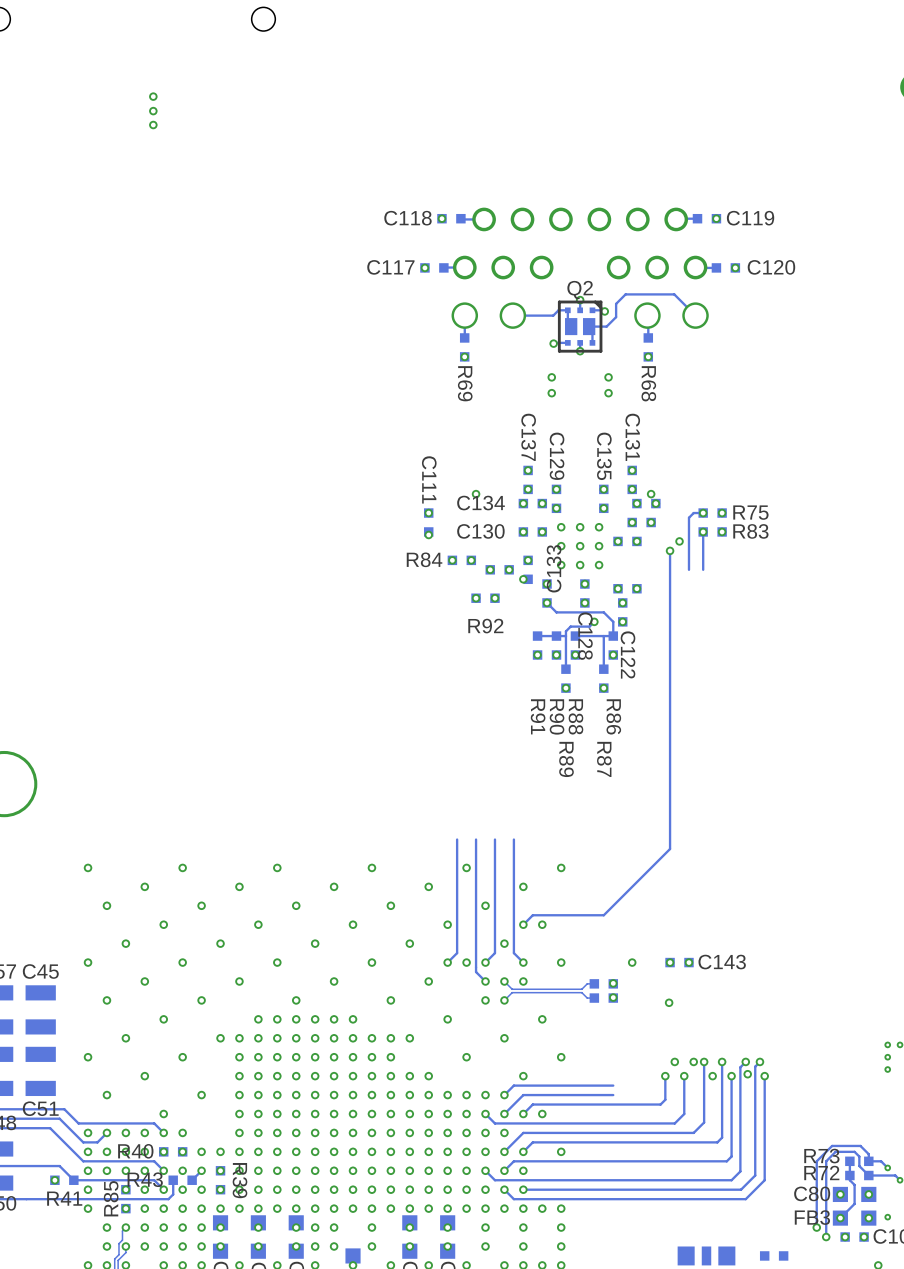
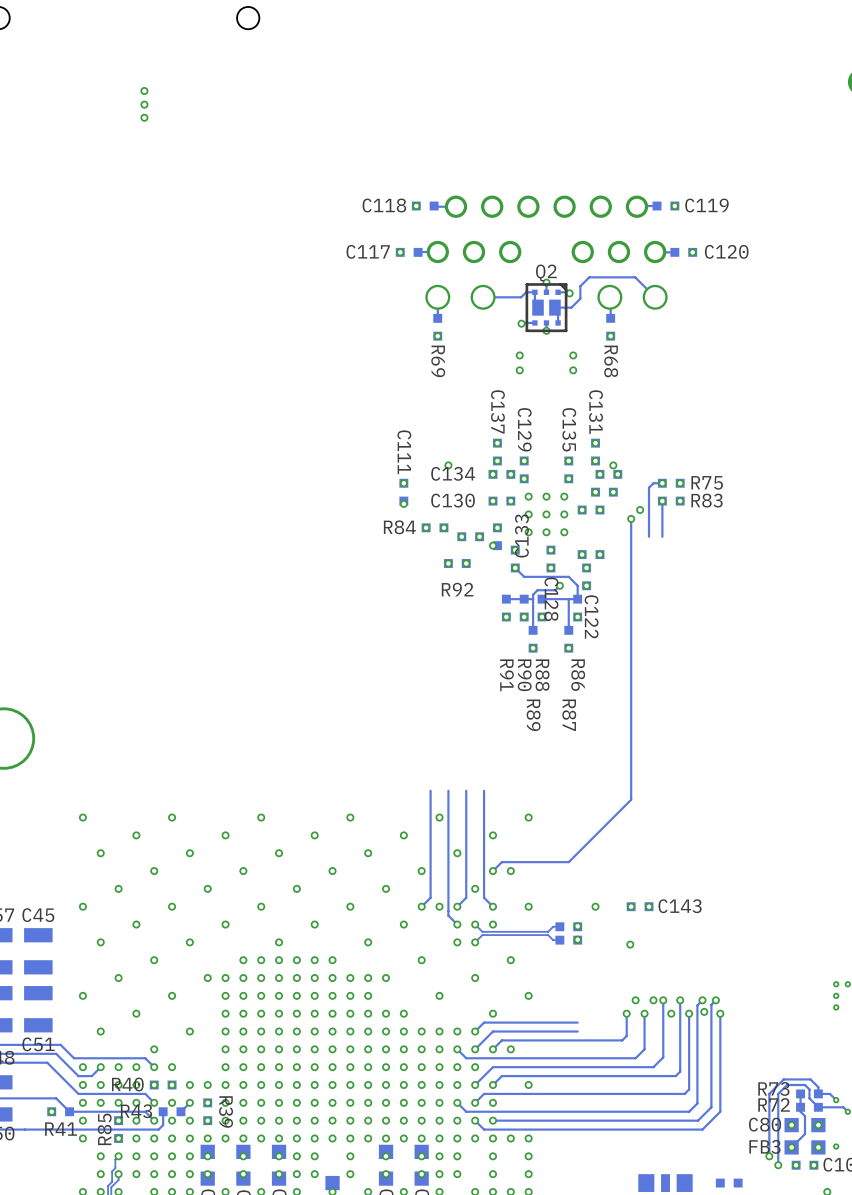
via: none -> (439, 1156)
via: none -> (439, 1174)

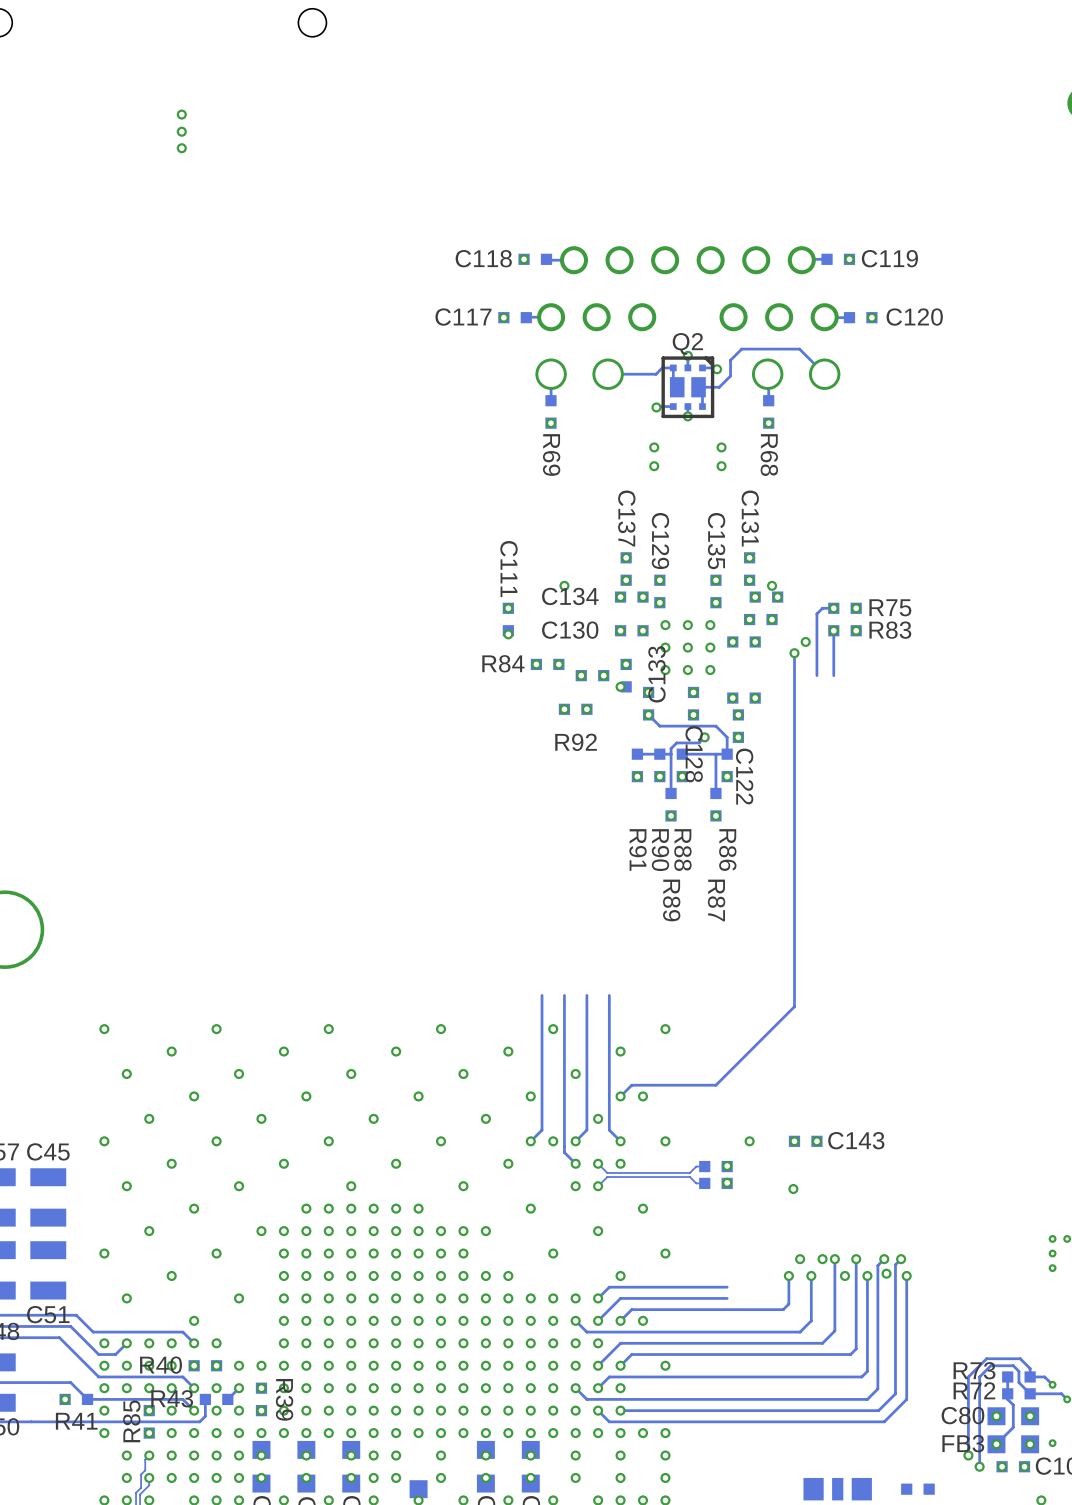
via: (439, 1156) -> none
via: (439, 1174) -> none

